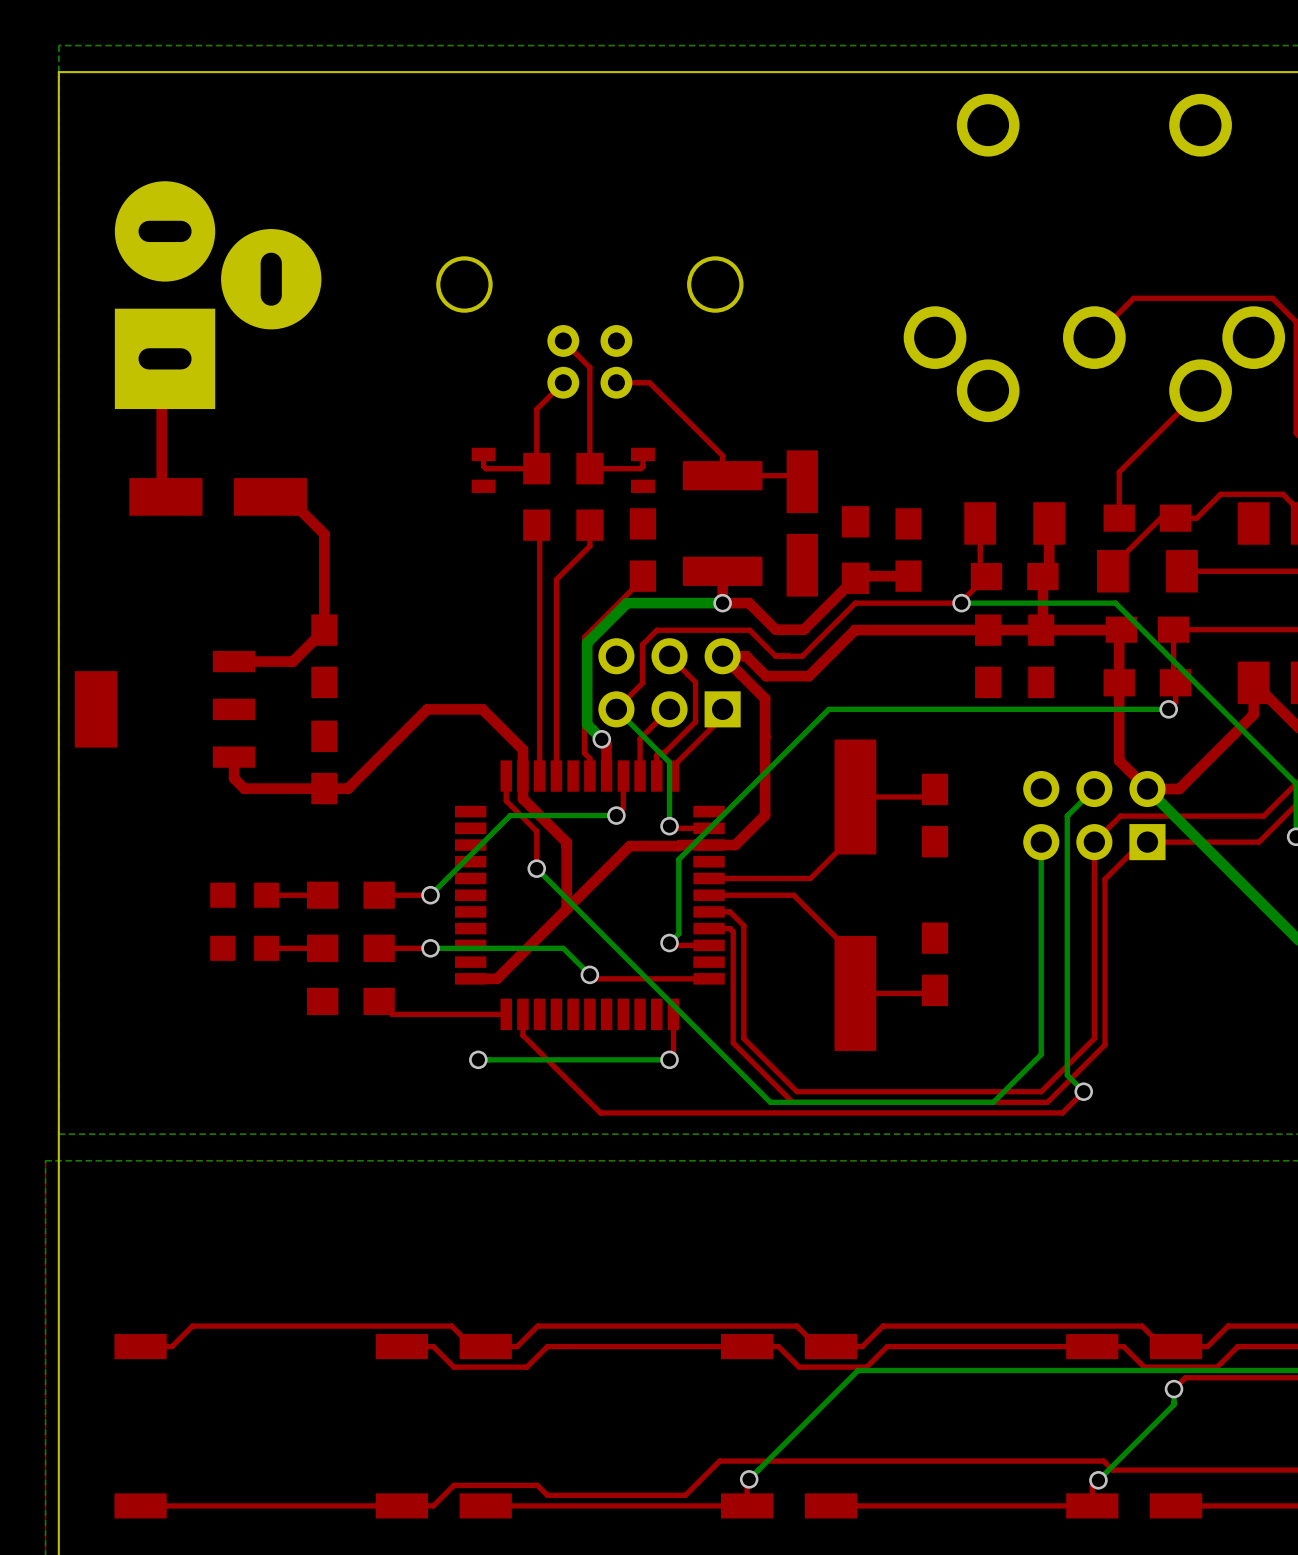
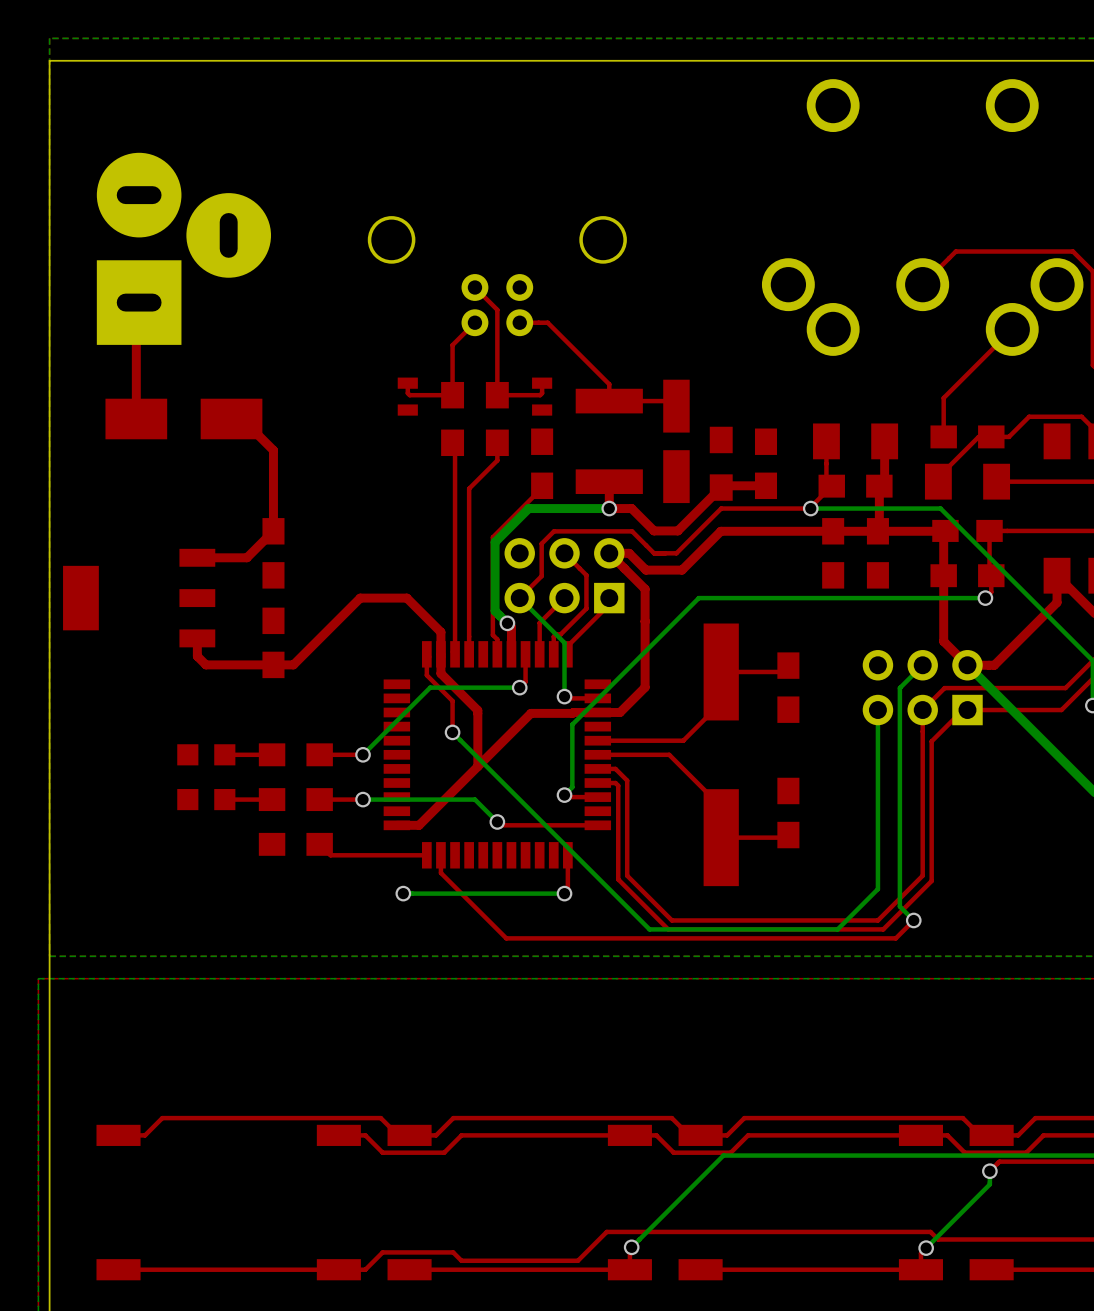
part footprint: [129, 478, 307, 516] -> [105, 398, 263, 440]

